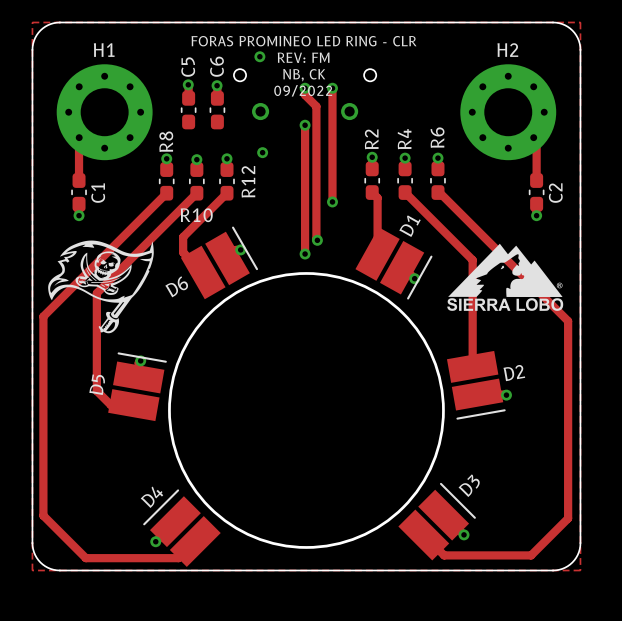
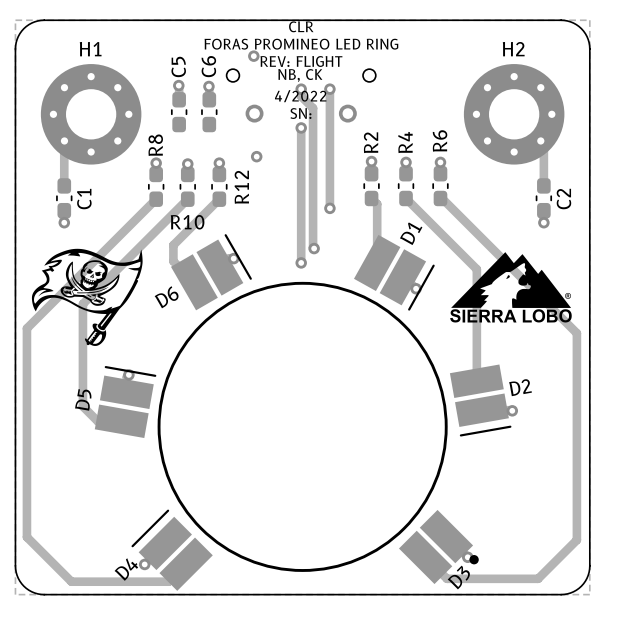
text: none -> CLR (301, 26)
text: FORAS PROMINEO LED RING - CLR (304, 41) -> FORAS PROMINEO LED RING (301, 44)
text: REV: FM (303, 57) -> REV: FLIGHT (301, 61)
text: 09/2022 (303, 90) -> 4/2022 (300, 96)
text: none -> SN: (300, 113)
D3 footprint: [398, 482, 476, 561] -> [398, 509, 479, 585]
D3 name position: D3 (469, 485) -> D3 (458, 577)
D4 name position: D4 (152, 497) -> D4 (126, 569)

